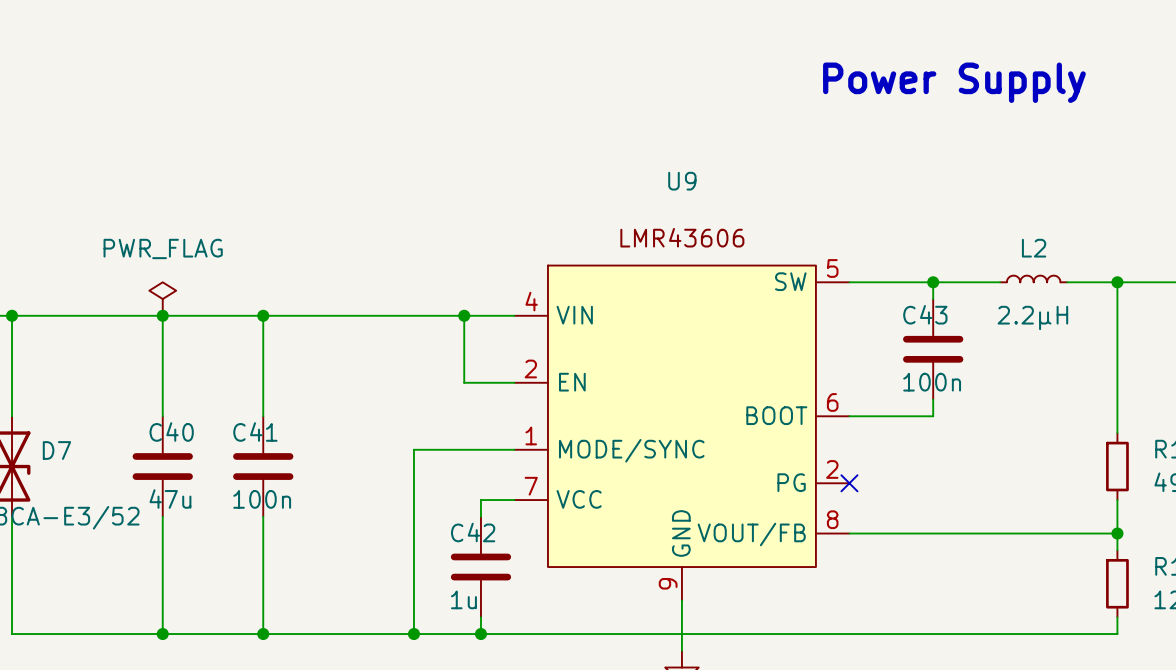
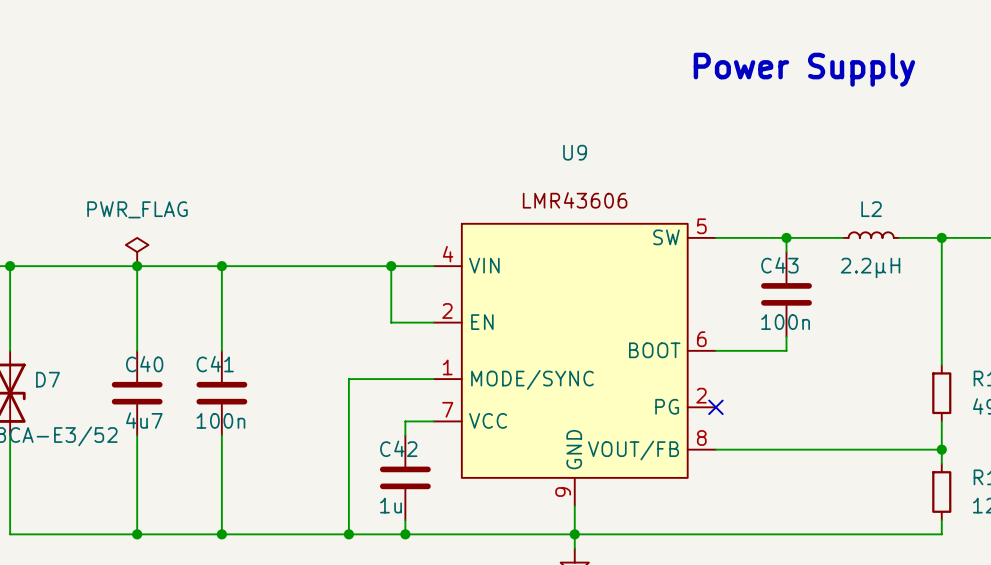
C40 value: 47u (170, 499) -> 4u7 (144, 420)
junction: none -> (574, 534)

